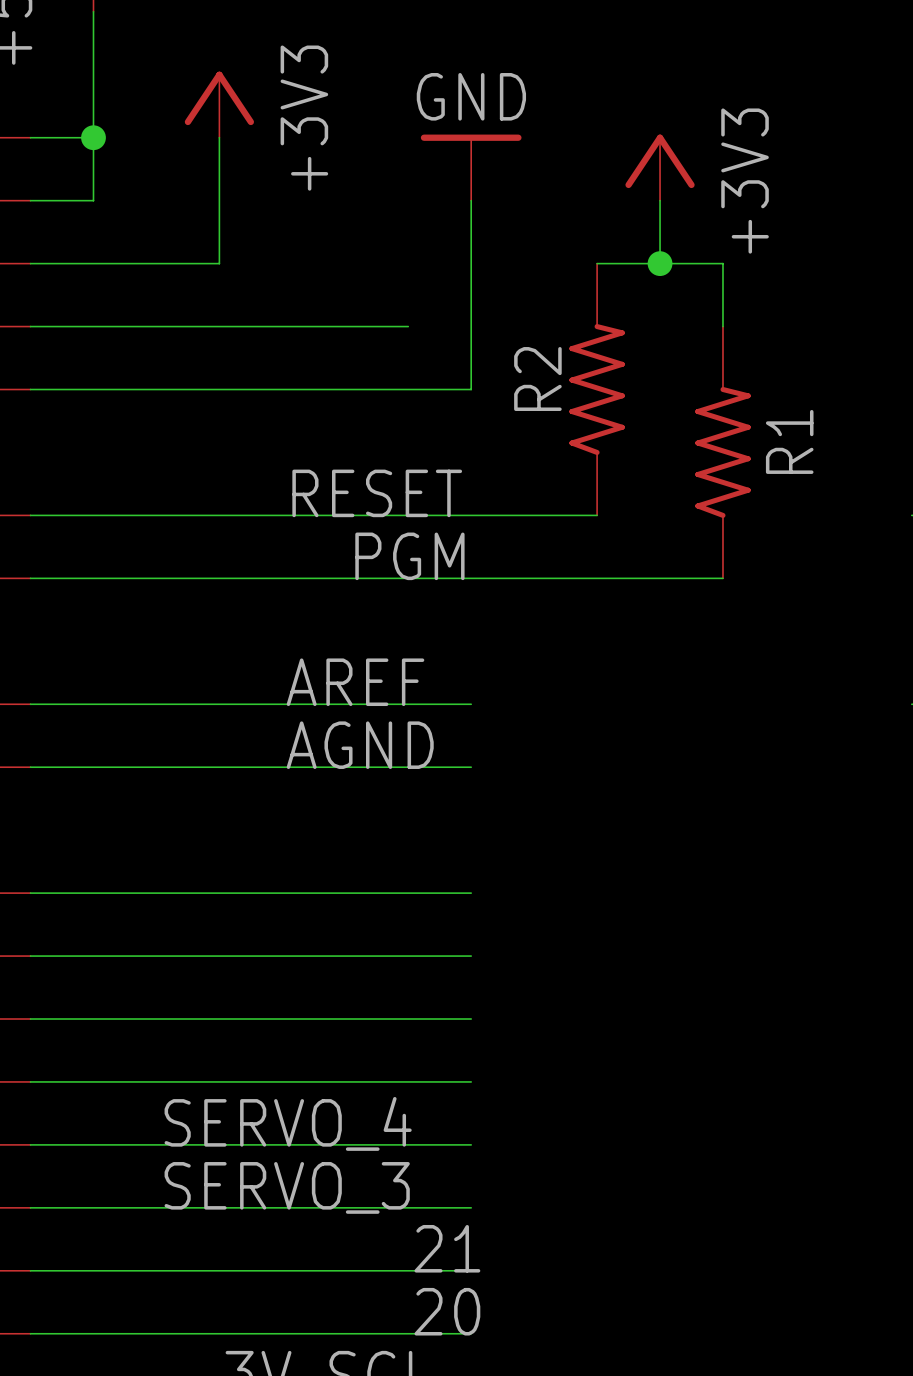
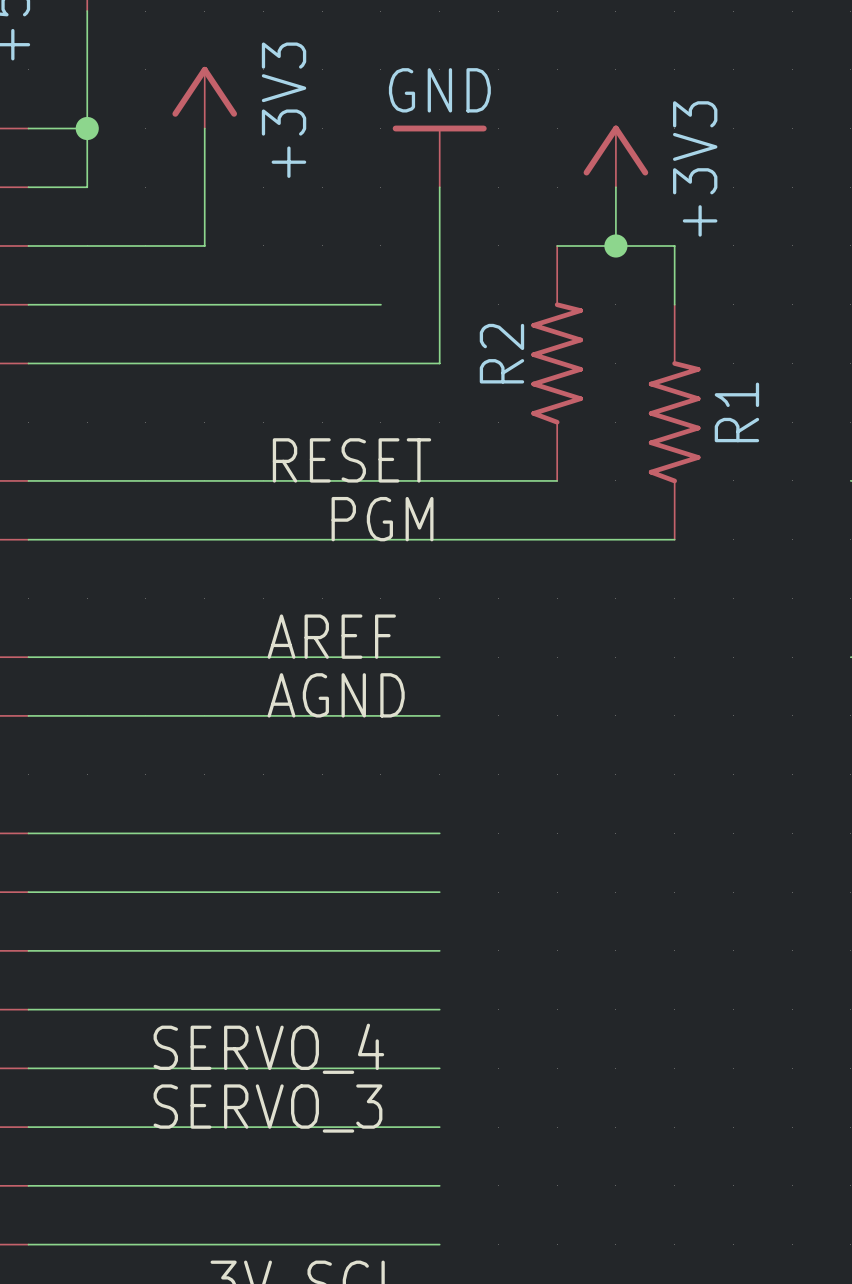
label: 21 (447, 1248) -> none
label: 20 (447, 1311) -> none

